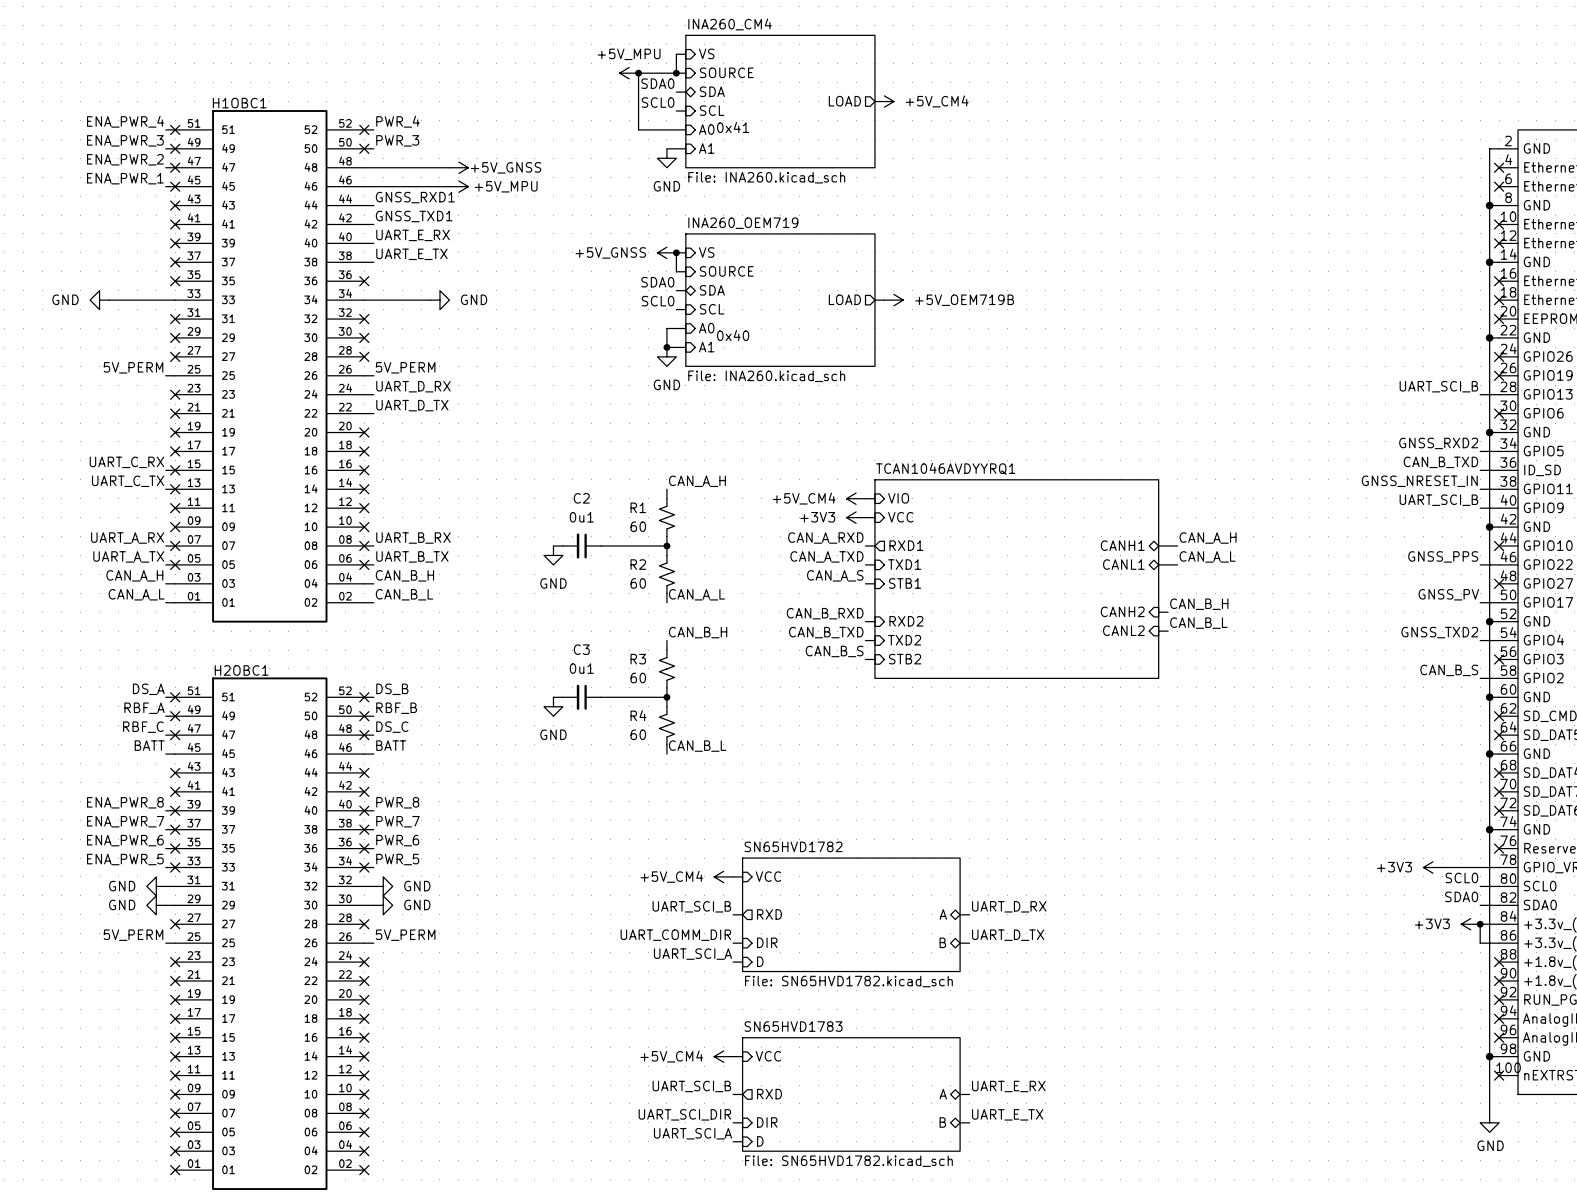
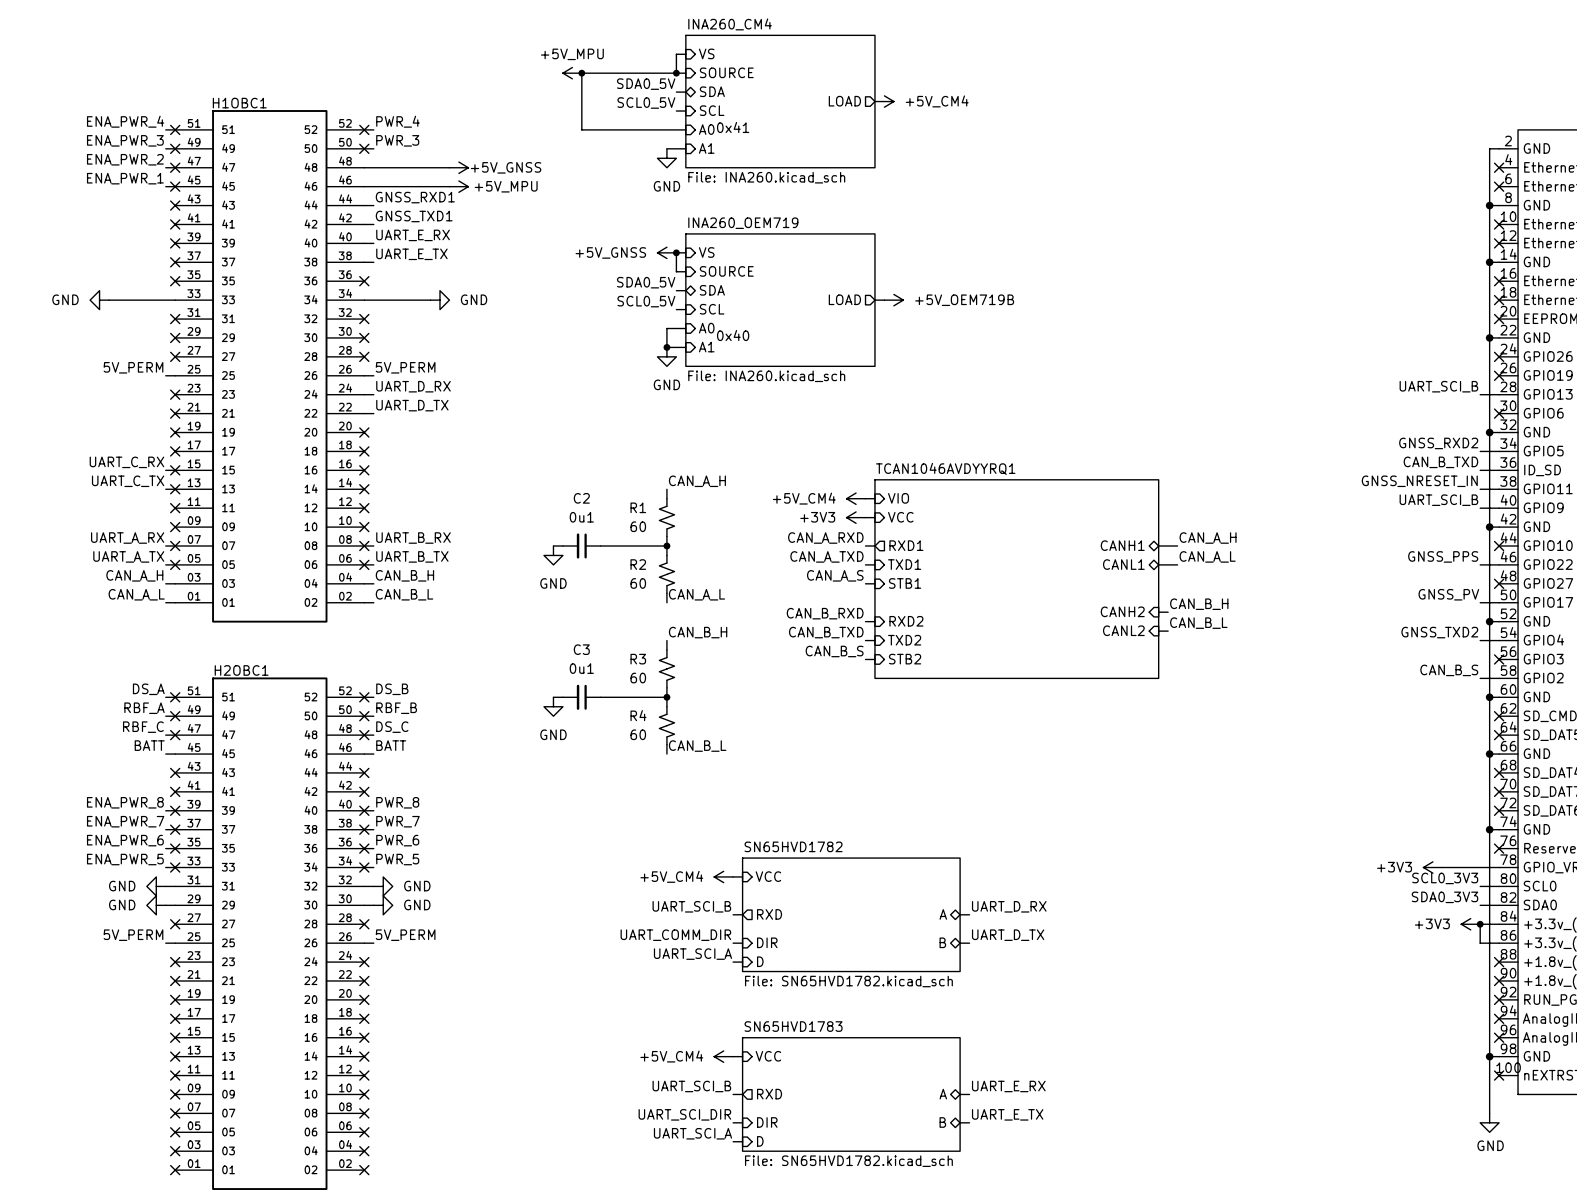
junction: none -> (581, 73)
power symbol position: +5V_MPU (629, 73) -> +5V_MPU (572, 73)
wire: (638, 73) (638, 129) -> (638, 73) (581, 73) (581, 129) (638, 129)
junction: (638, 73) -> none
label: SDA0 (657, 83) -> SDA0_5V (646, 84)
label: SCL0 (658, 102) -> SCL0_5V (646, 103)
label: SDA0 (657, 282) -> SDA0_5V (646, 282)
label: SCL0 (658, 301) -> SCL0_5V (646, 301)
label: SCL0 (1461, 877) -> SCL0_3V3 (1445, 878)
label: SDA0 (1461, 896) -> SDA0_3V3 (1444, 897)

